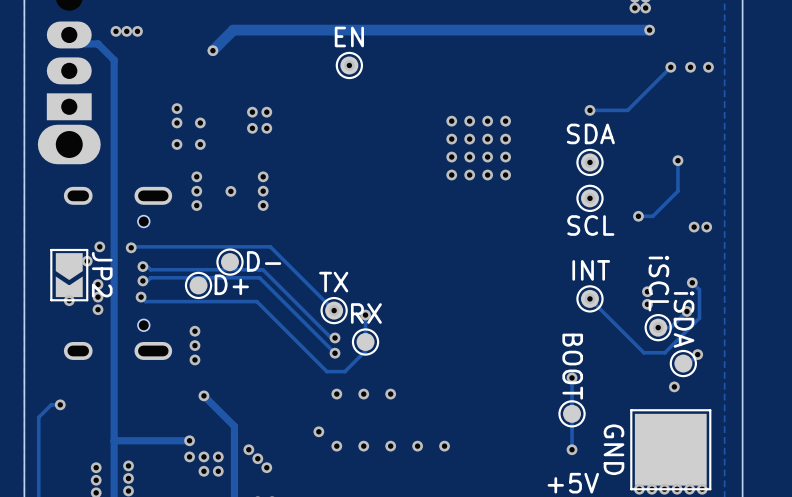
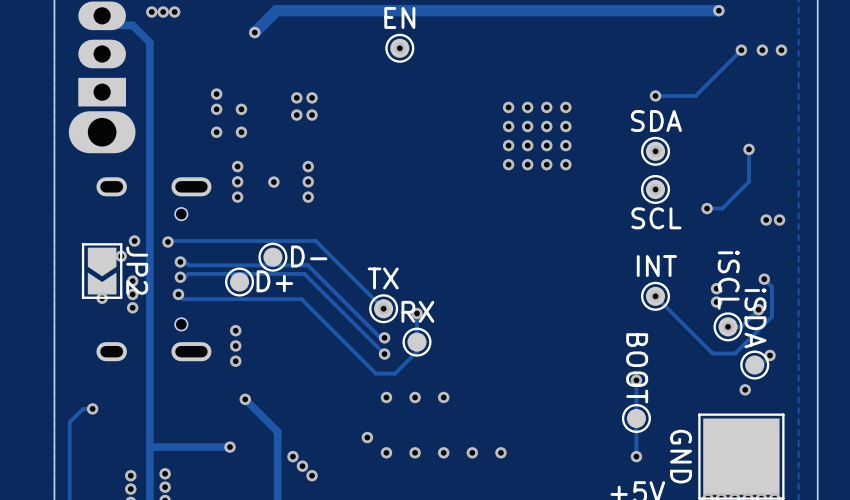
via: (189, 456) -> none
via: (203, 456) -> none
via: (218, 456) -> none
via: (203, 471) -> none
via: (218, 471) -> none

